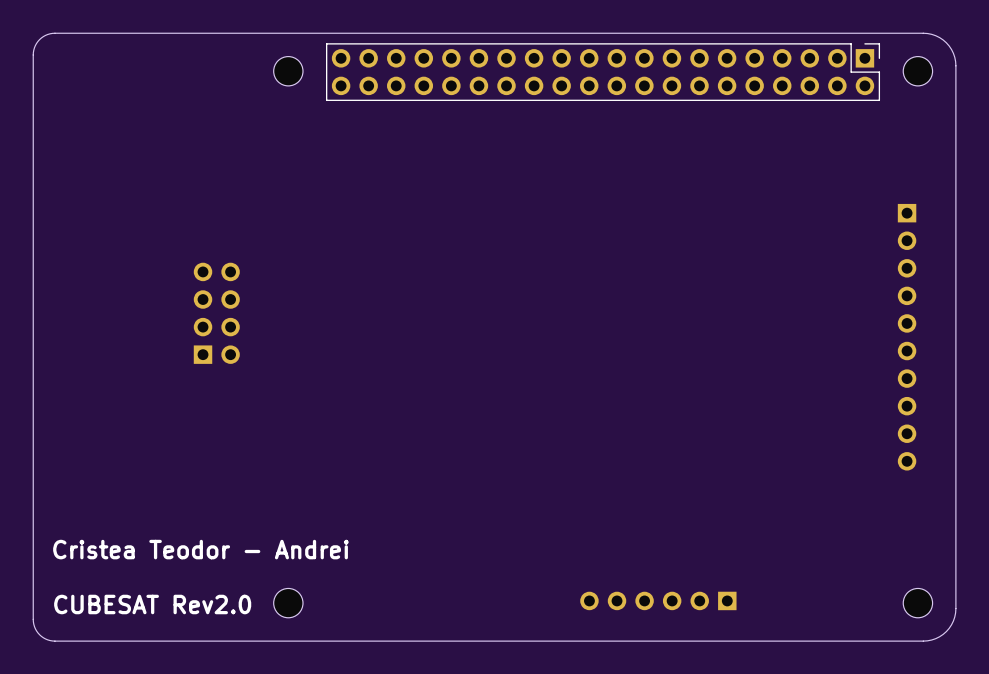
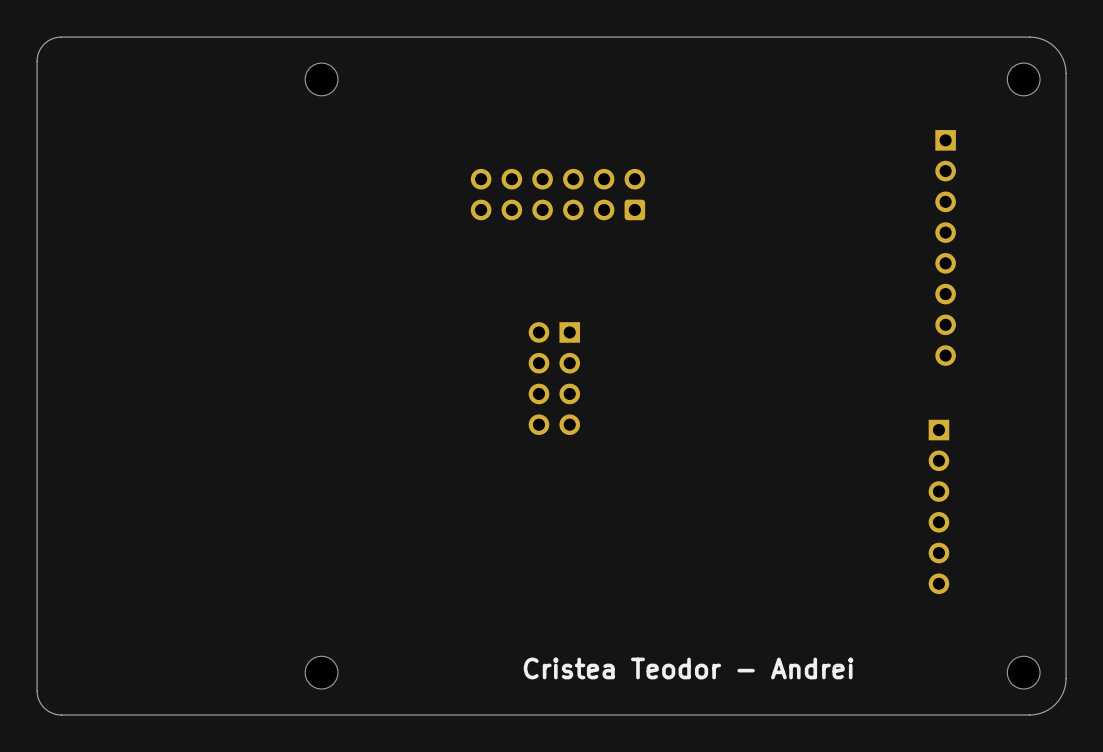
part: (603, 72) -> none
part: none -> (557, 194)
part: none -> (945, 247)
part: (216, 313) -> none
part: (907, 337) -> none
part: none -> (554, 378)
text: Cristea Teodor - Andrei (200, 549) -> none
text: none -> Cristea Teodor - Andrei (688, 668)
part rotation: 0° (658, 600) -> 90° counterclockwise (938, 506)
part position: (658, 600) -> (938, 506)
text: CUBESAT Rev2.0 (152, 604) -> none

